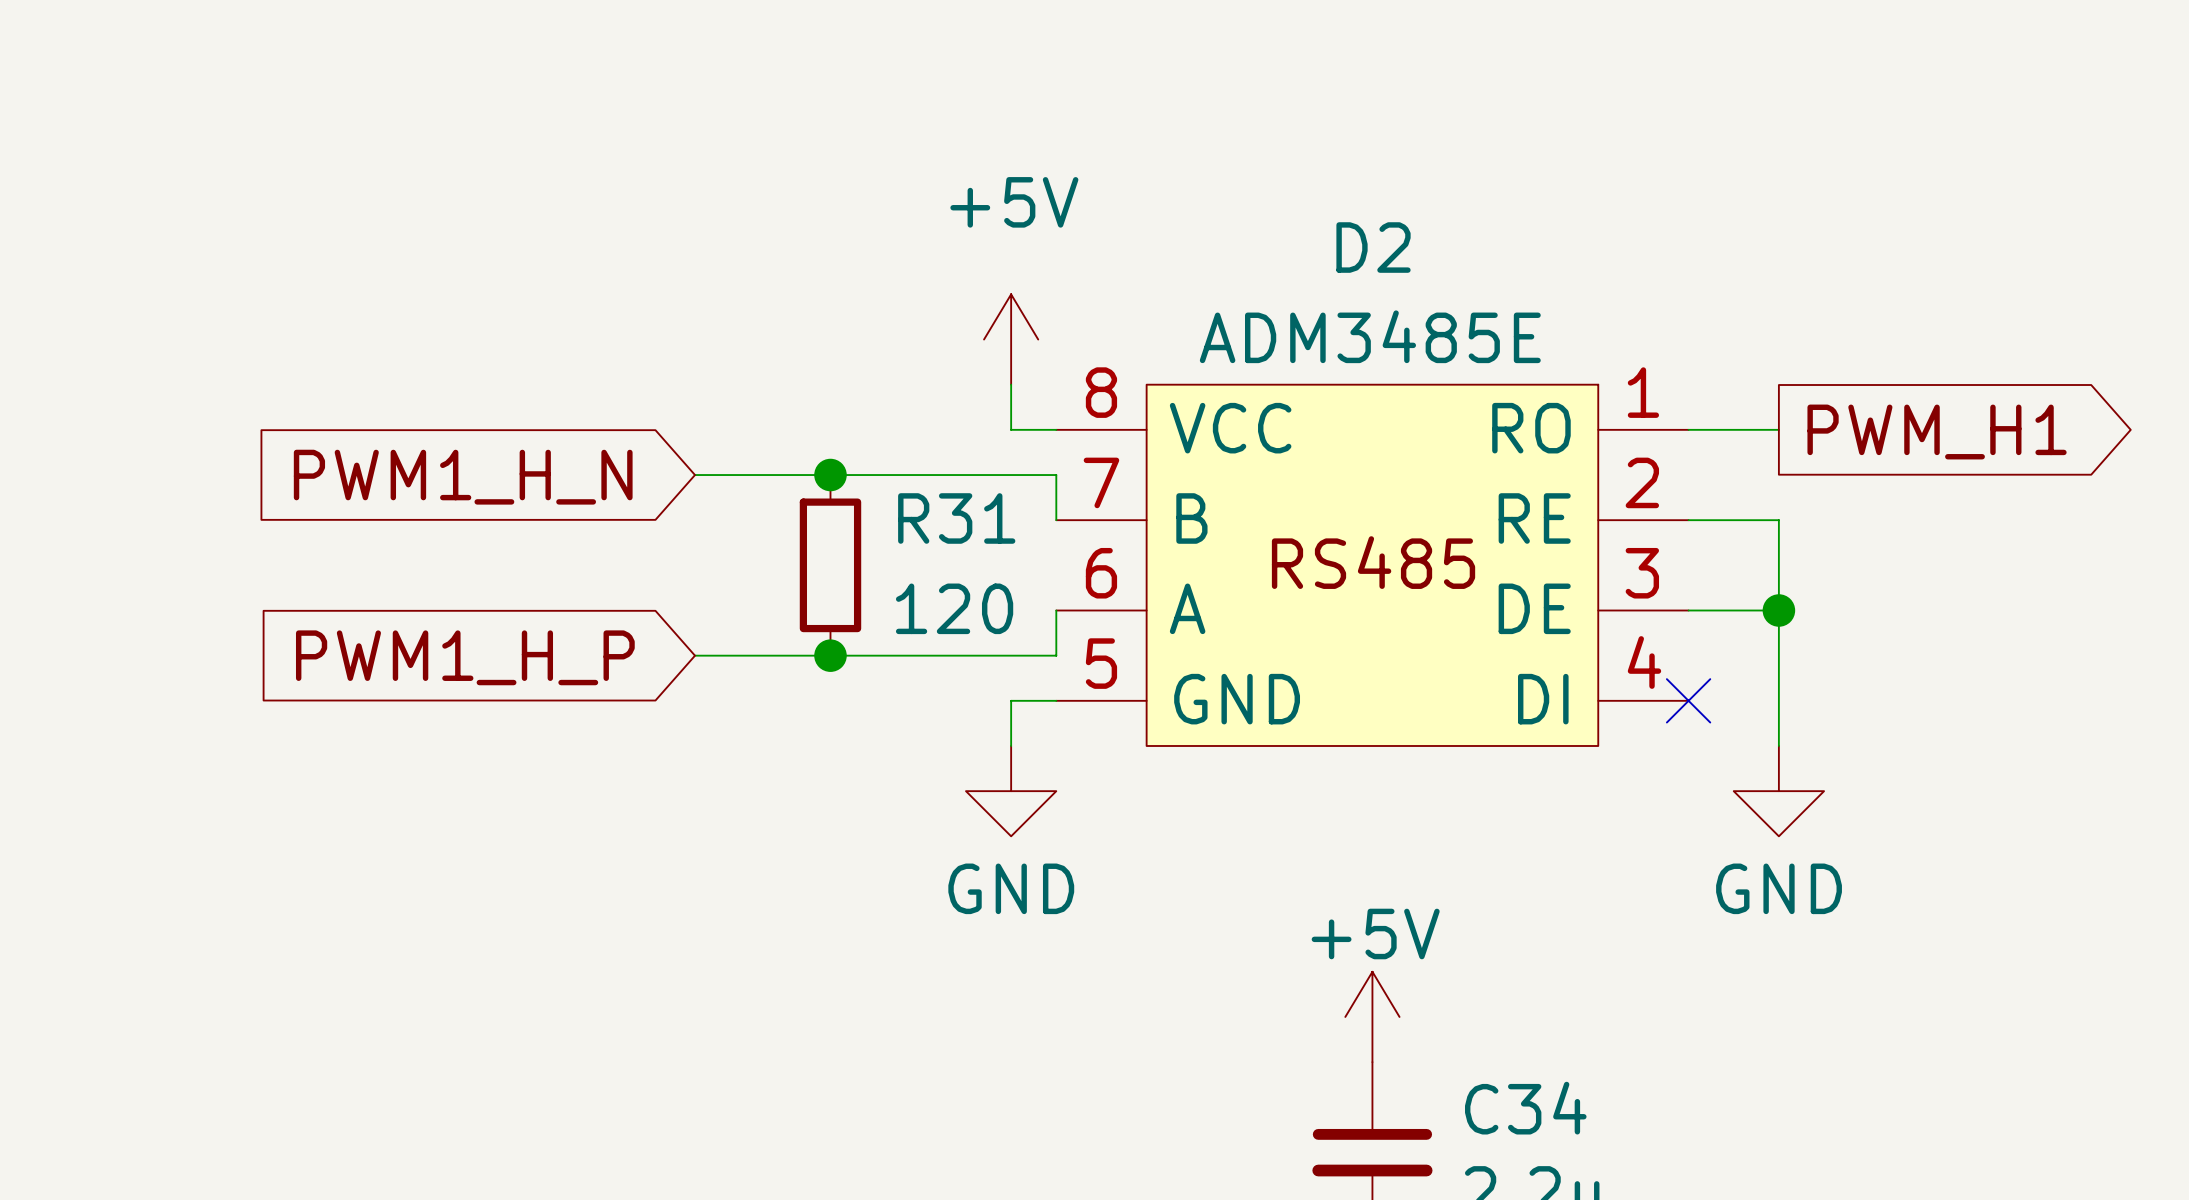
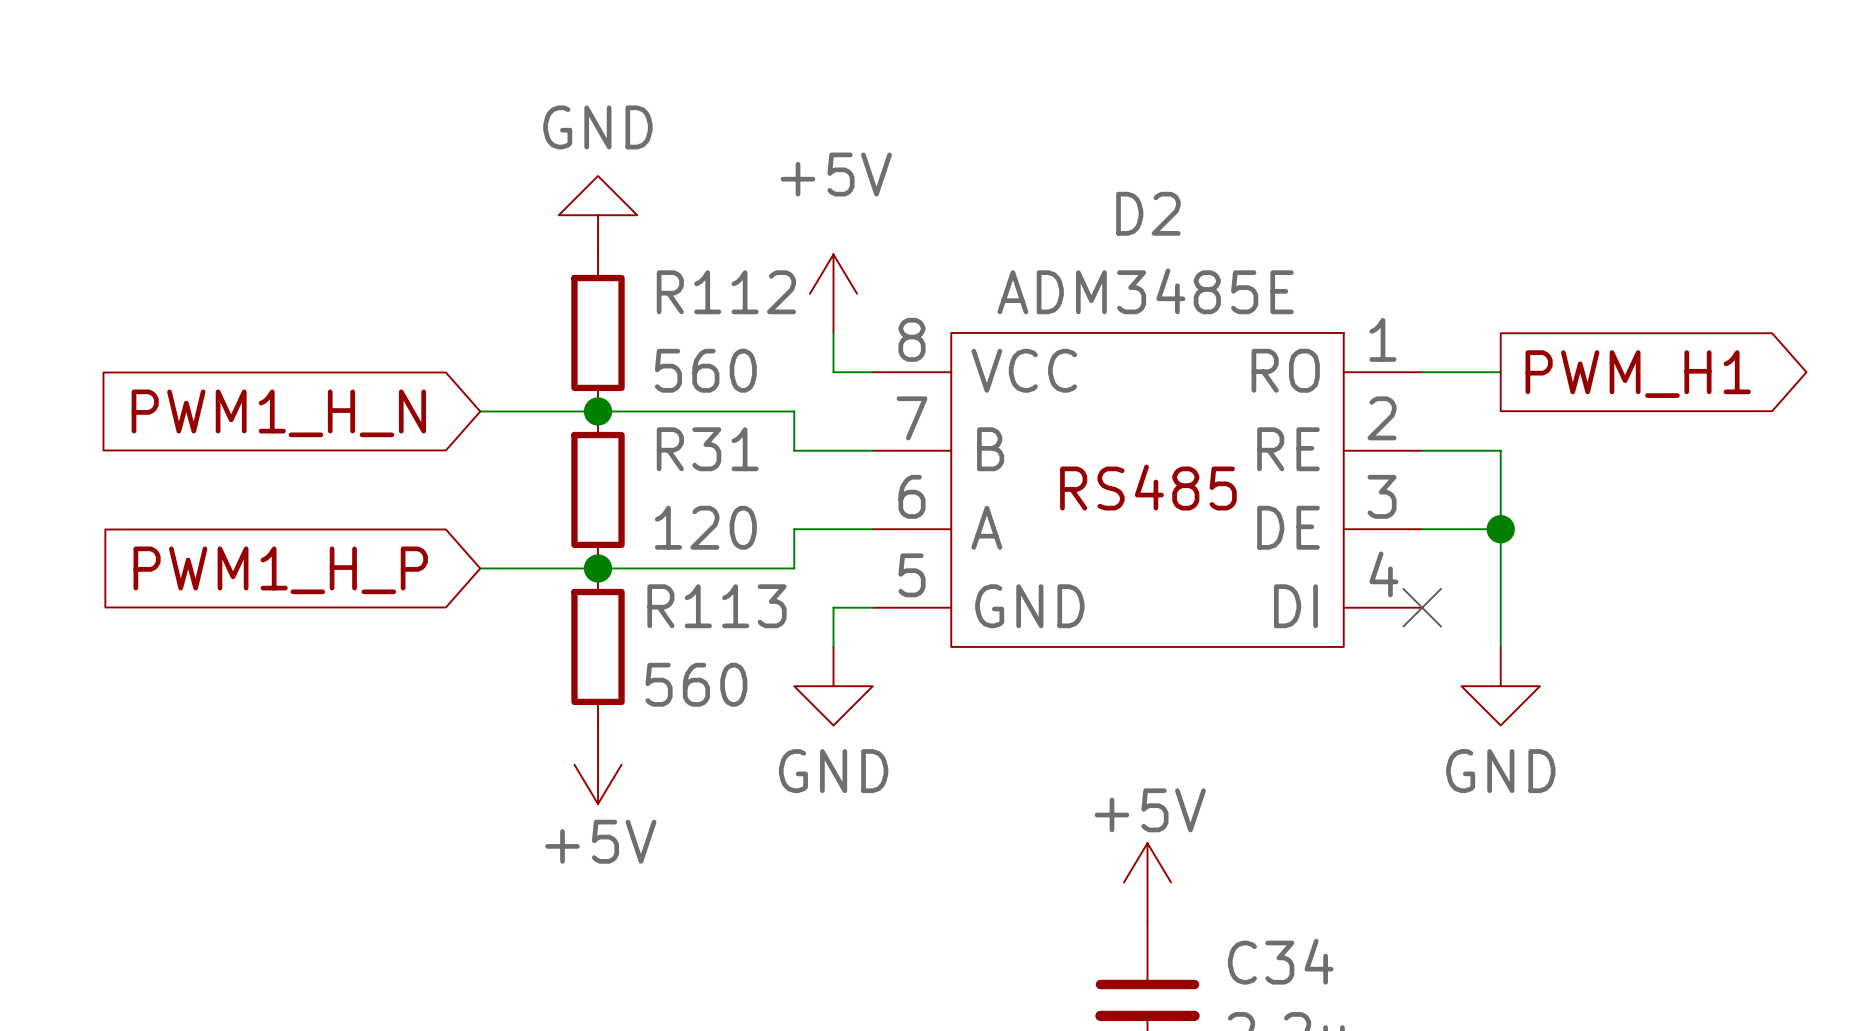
power symbol: none -> GND (598, 215)
R112: none -> 560 (598, 332)
wire: none -> (480, 411) (558, 411)
junction position: (830, 475) -> (598, 411)
wire: (965, 475) (1056, 475) (1056, 520) -> (794, 411) (794, 450) (872, 450)
global label position: PWM1_H_N (463, 477) -> PWM1_H_N (278, 413)
R31 position: (830, 565) -> (598, 489)
wire: (1056, 610) (1056, 655) (965, 655) -> (872, 529) (794, 529) (794, 568)
wire: none -> (480, 568) (558, 568)
junction position: (830, 655) -> (598, 568)
global label position: PWM1_H_P (465, 657) -> PWM1_H_P (280, 570)
R113: none -> 560 (598, 646)
power symbol: none -> +5V (598, 764)

